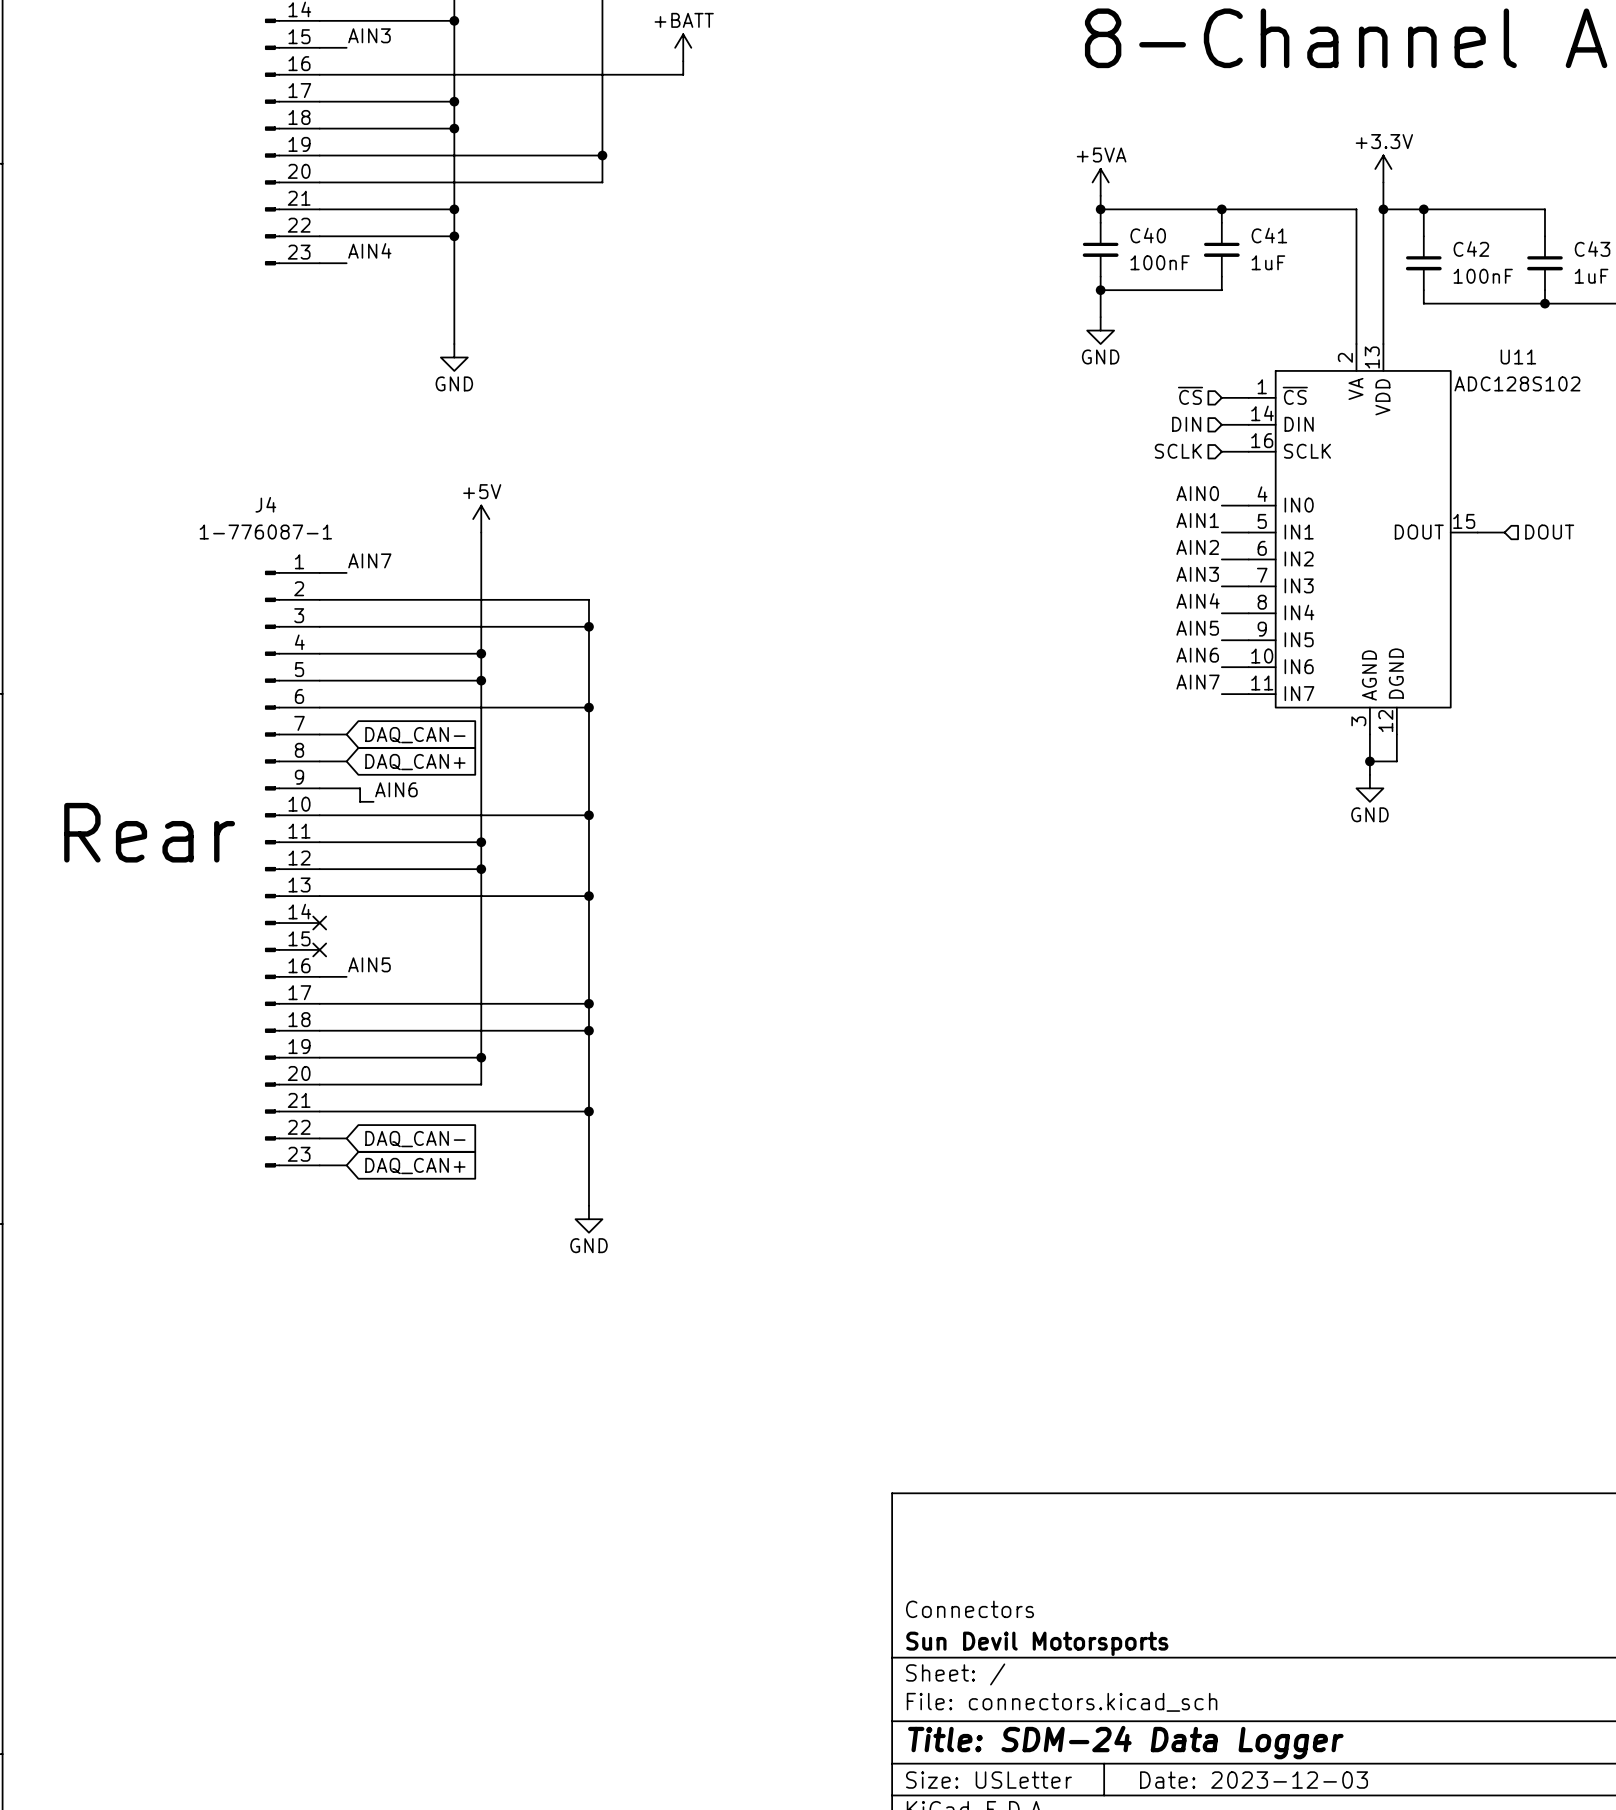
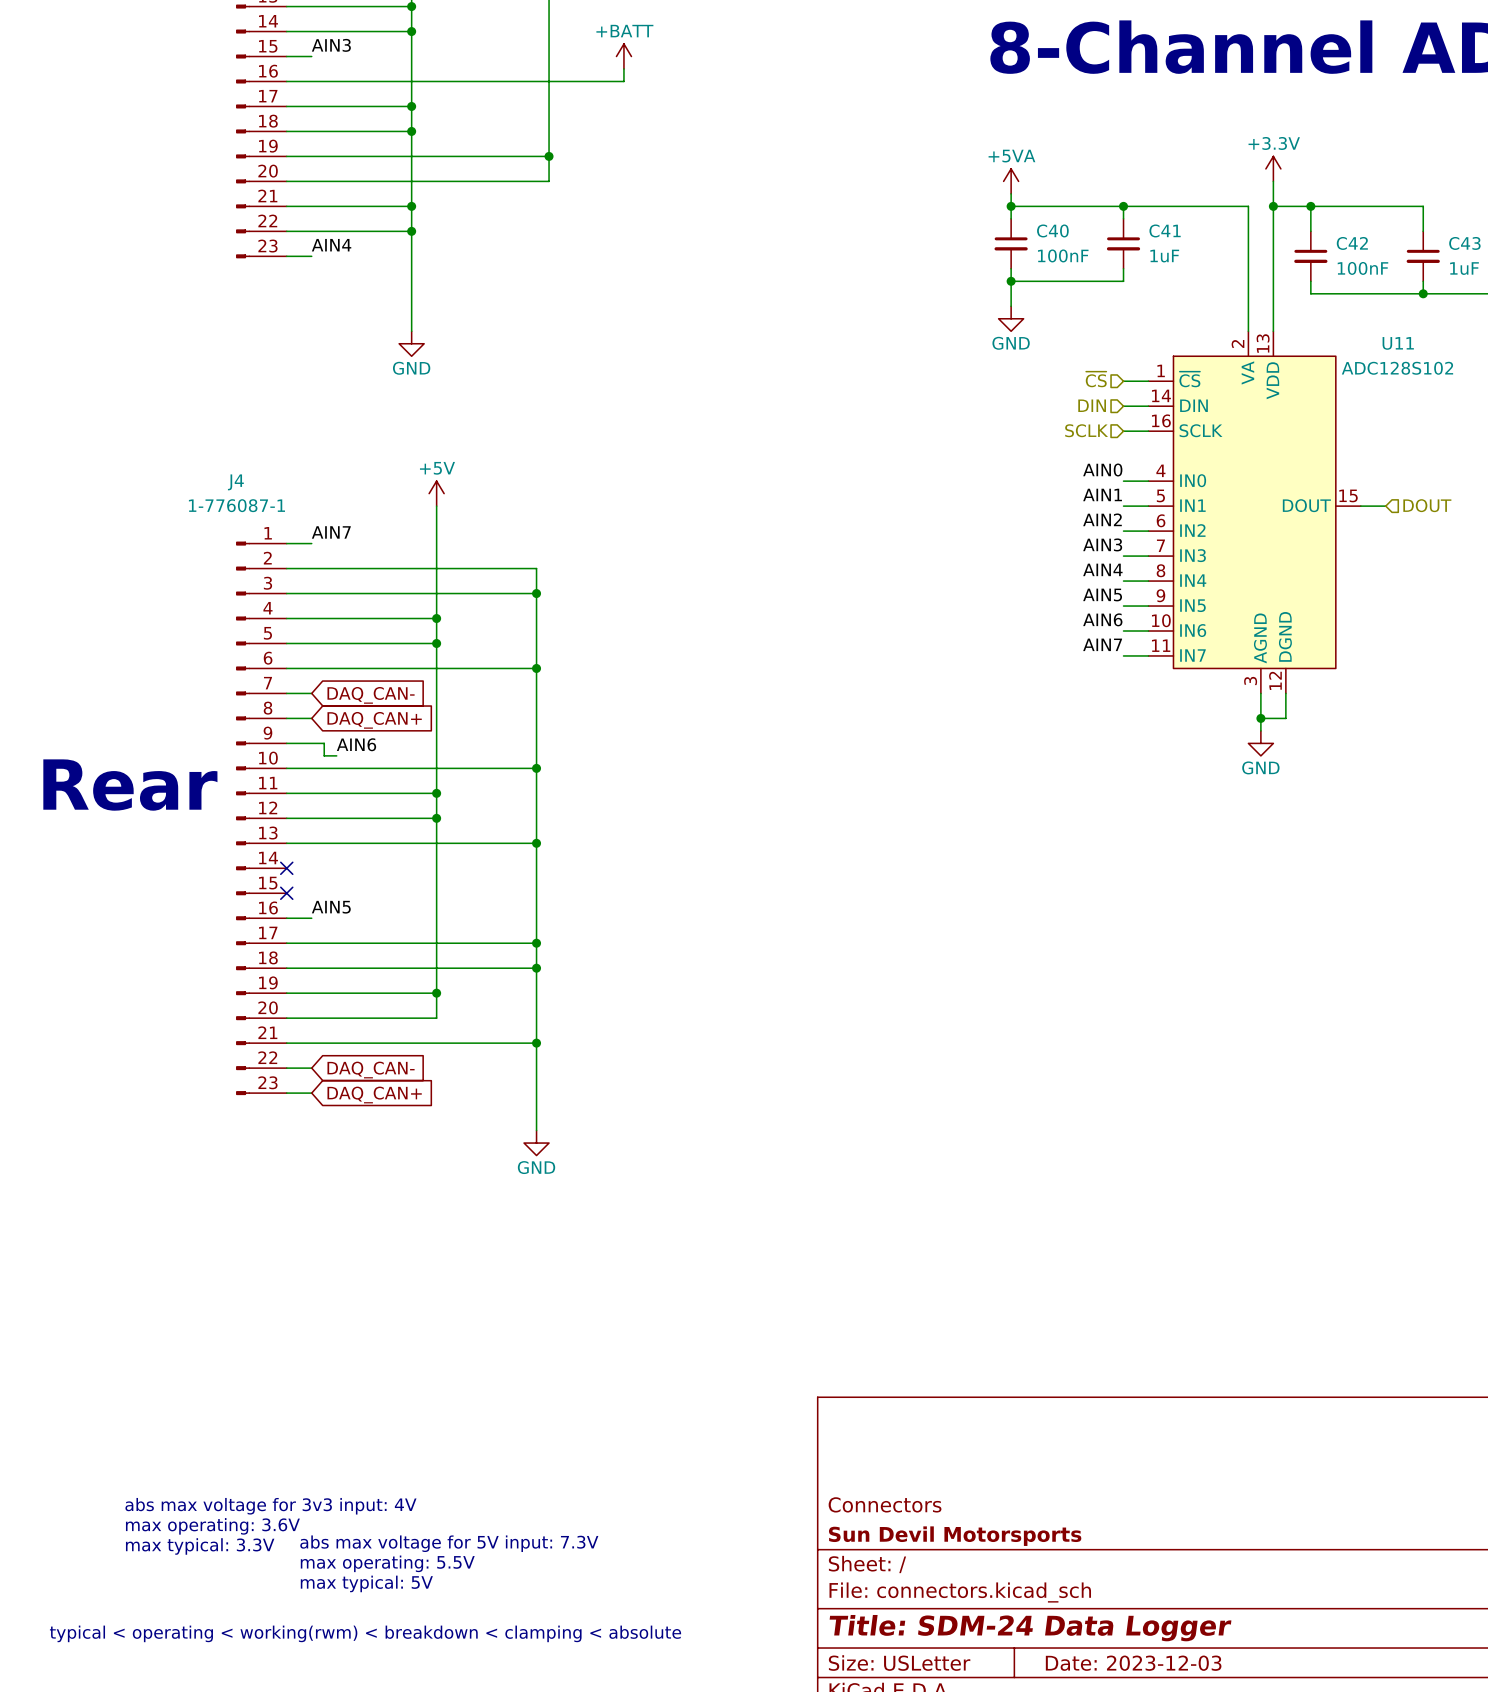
text: none -> abs max voltage for 3v3 input: 4V (270, 1506)
text: none -> max operating: 3.6V (212, 1526)
text: none -> abs max voltage for 5V input: 7.3V (449, 1543)
text: none -> max typical: 3.3V (200, 1546)
text: none -> max operating: 5.5V (387, 1563)
text: none -> max typical: 5V (366, 1583)
text: none -> typical < operating < working(rwm) < breakdown < clamping < absolute (365, 1633)

